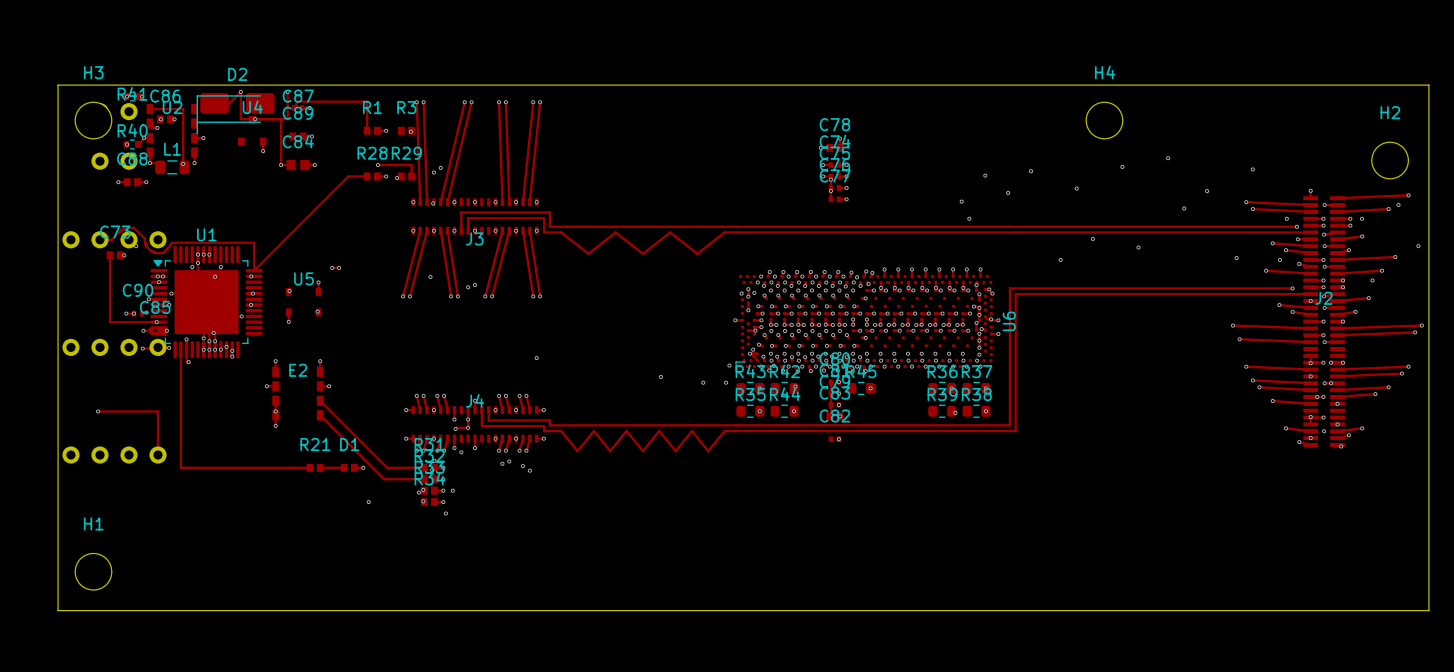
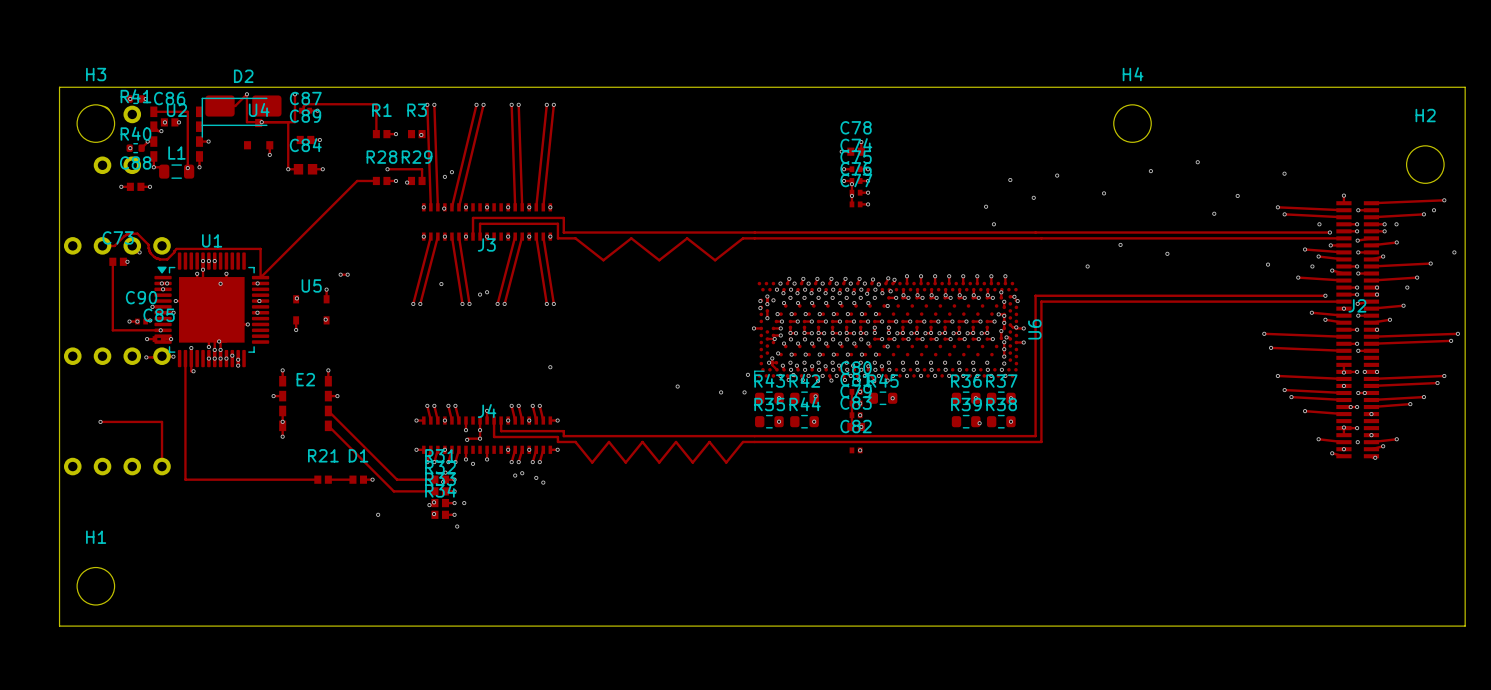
via: none -> (760, 308)

